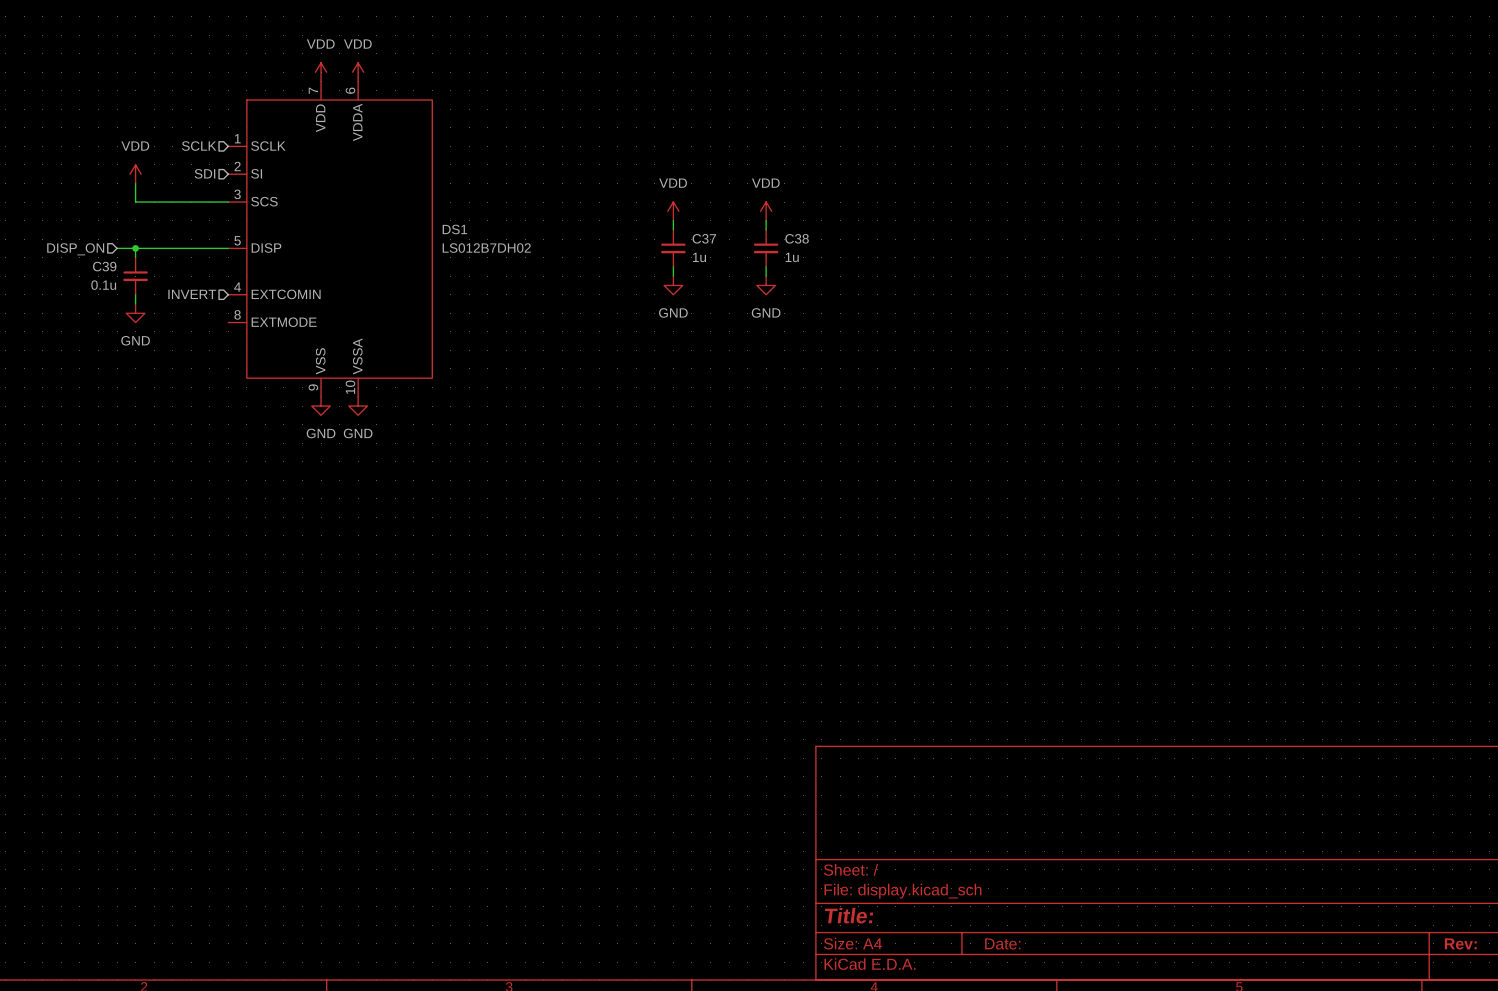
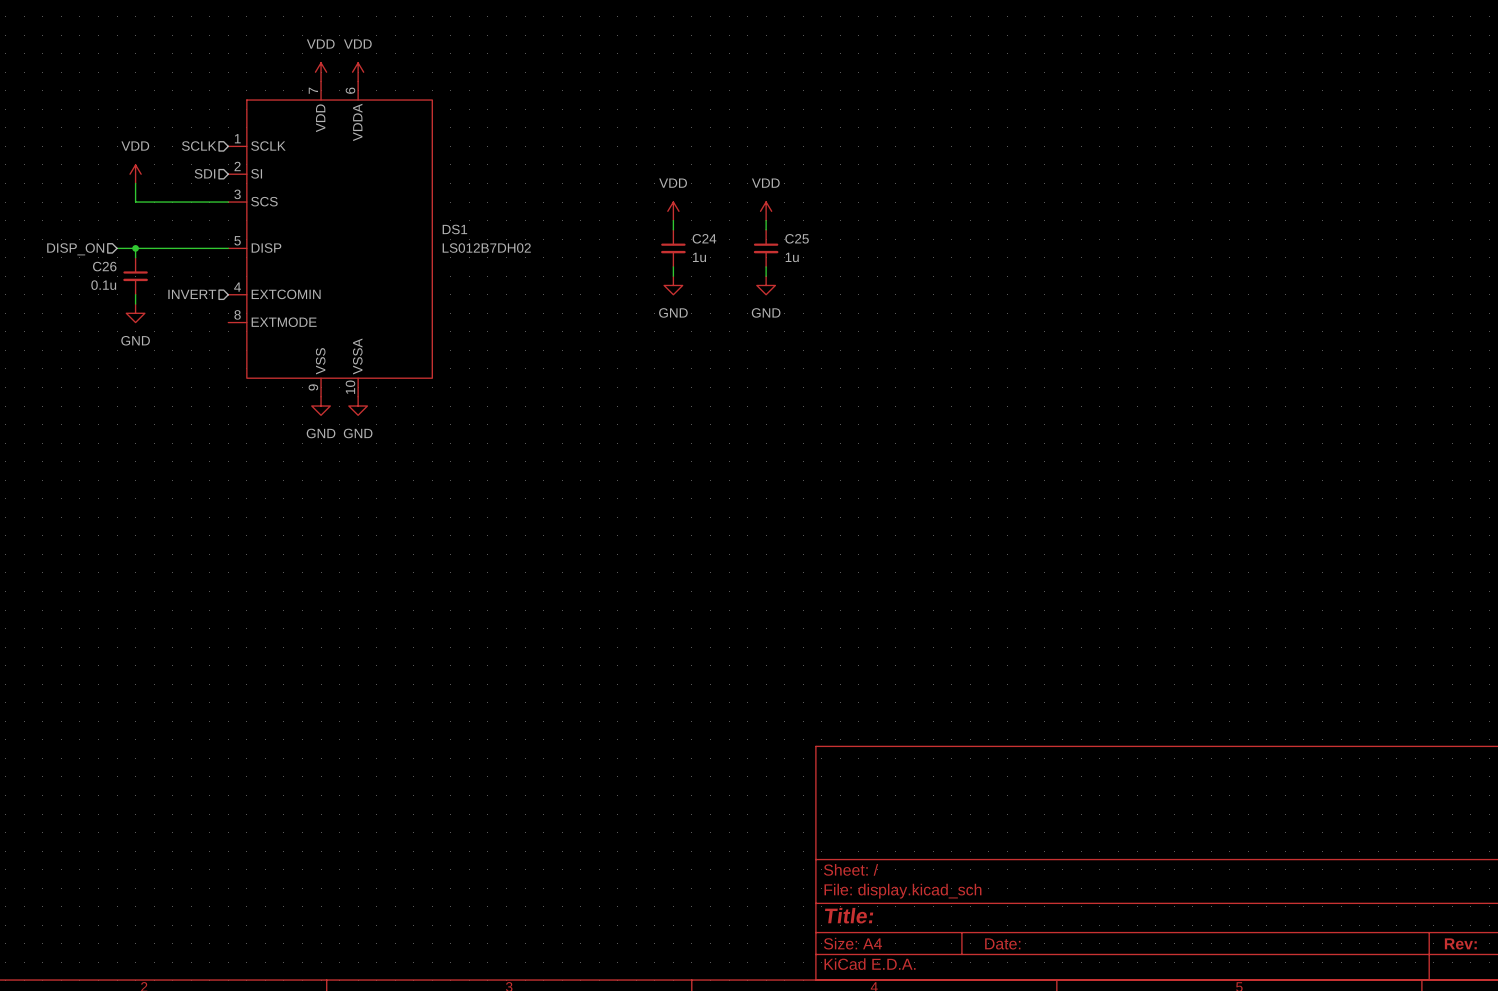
C37 name: C37 (704, 238) -> C24 (704, 238)
C38 name: C38 (797, 238) -> C25 (797, 238)
C39 name: C39 (104, 266) -> C26 (104, 266)

